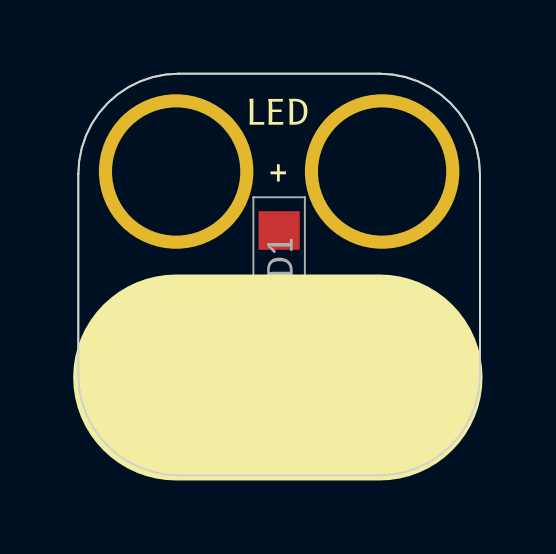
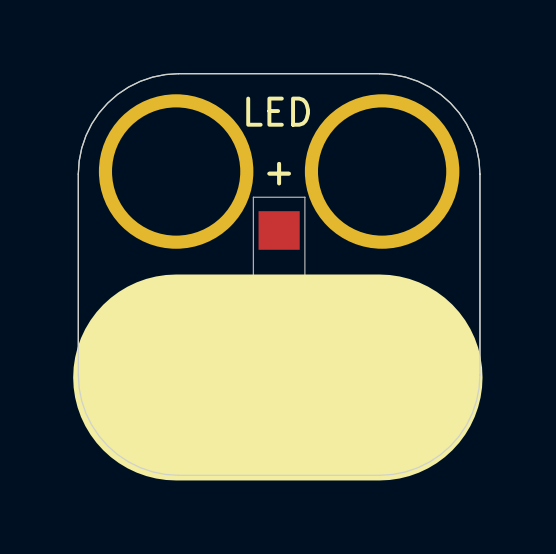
LED1 name: LED1 (279, 276) -> none

